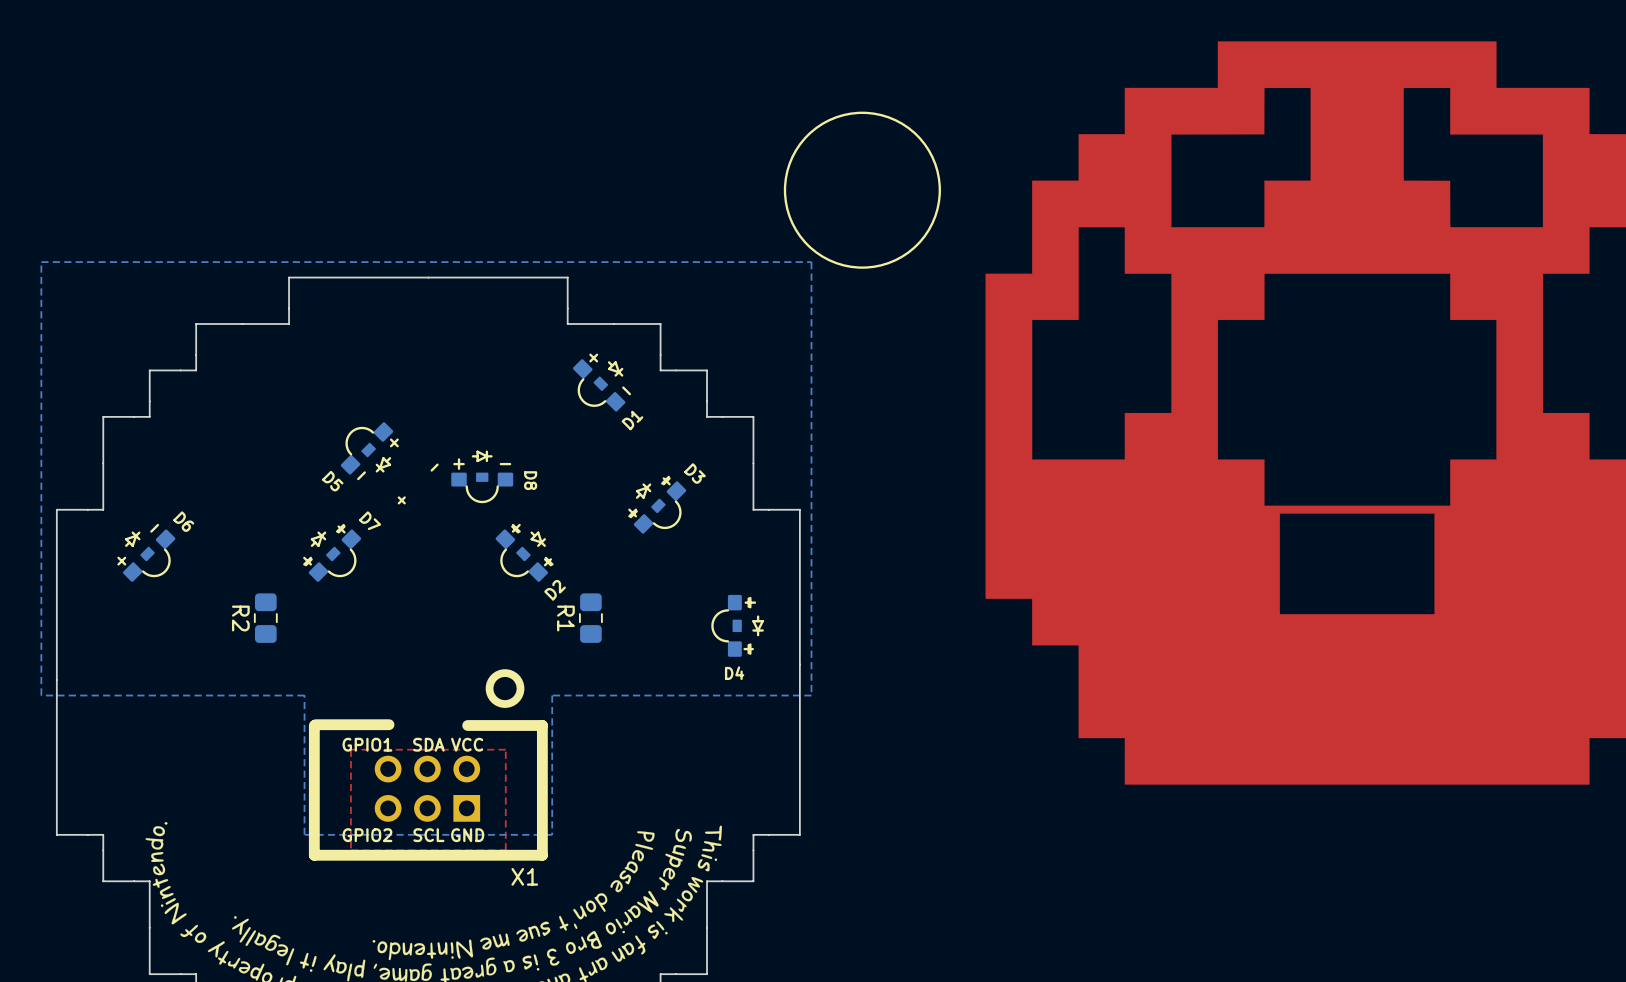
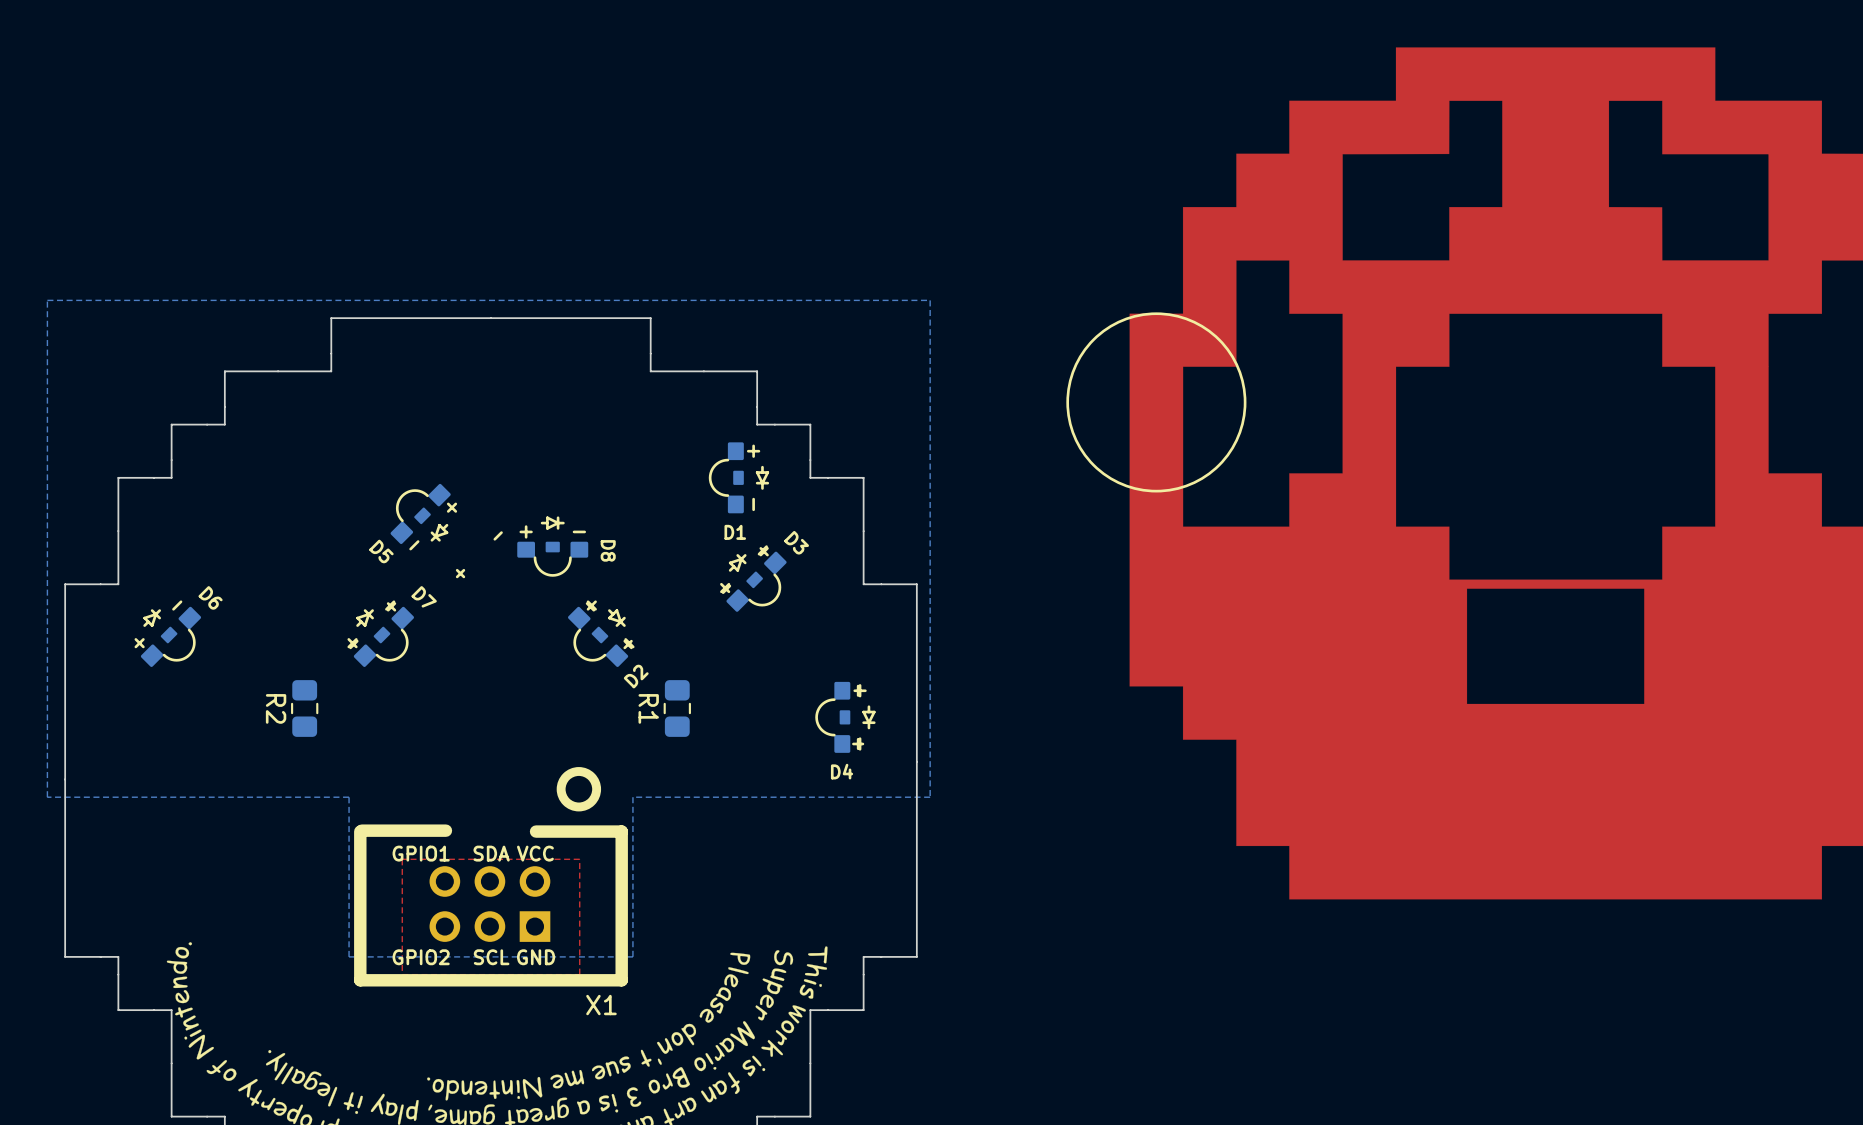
drawing position: (862, 190) -> (1156, 402)
D1 rotation: 0° (601, 382) -> 45° clockwise (738, 477)
D1 position: (601, 382) -> (738, 477)

